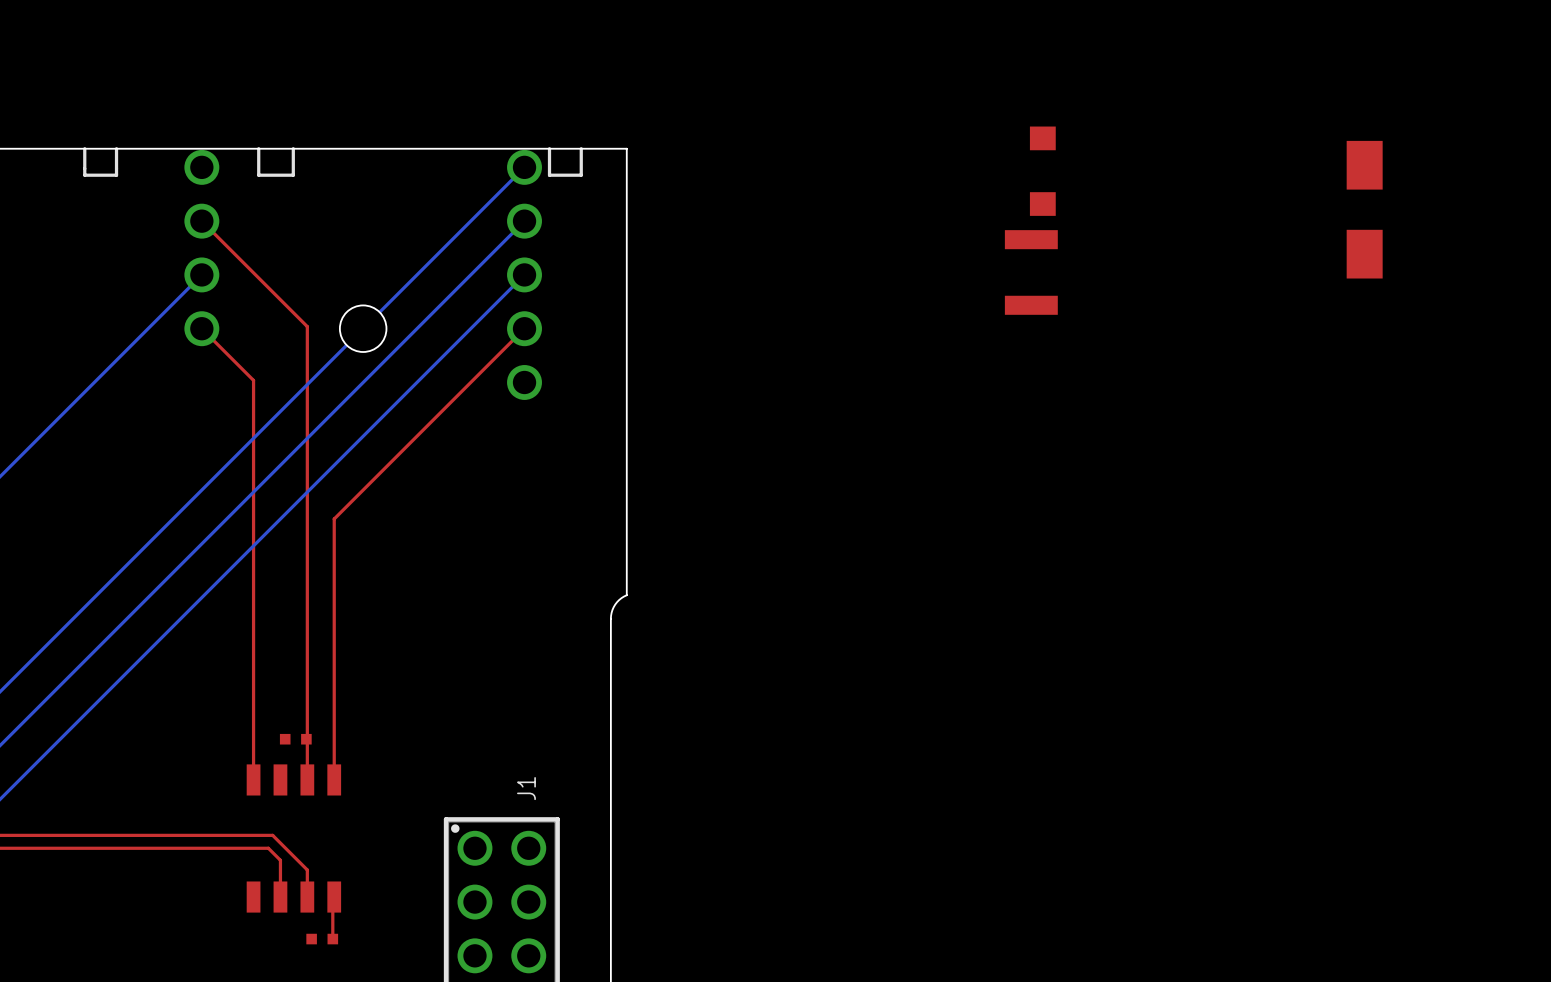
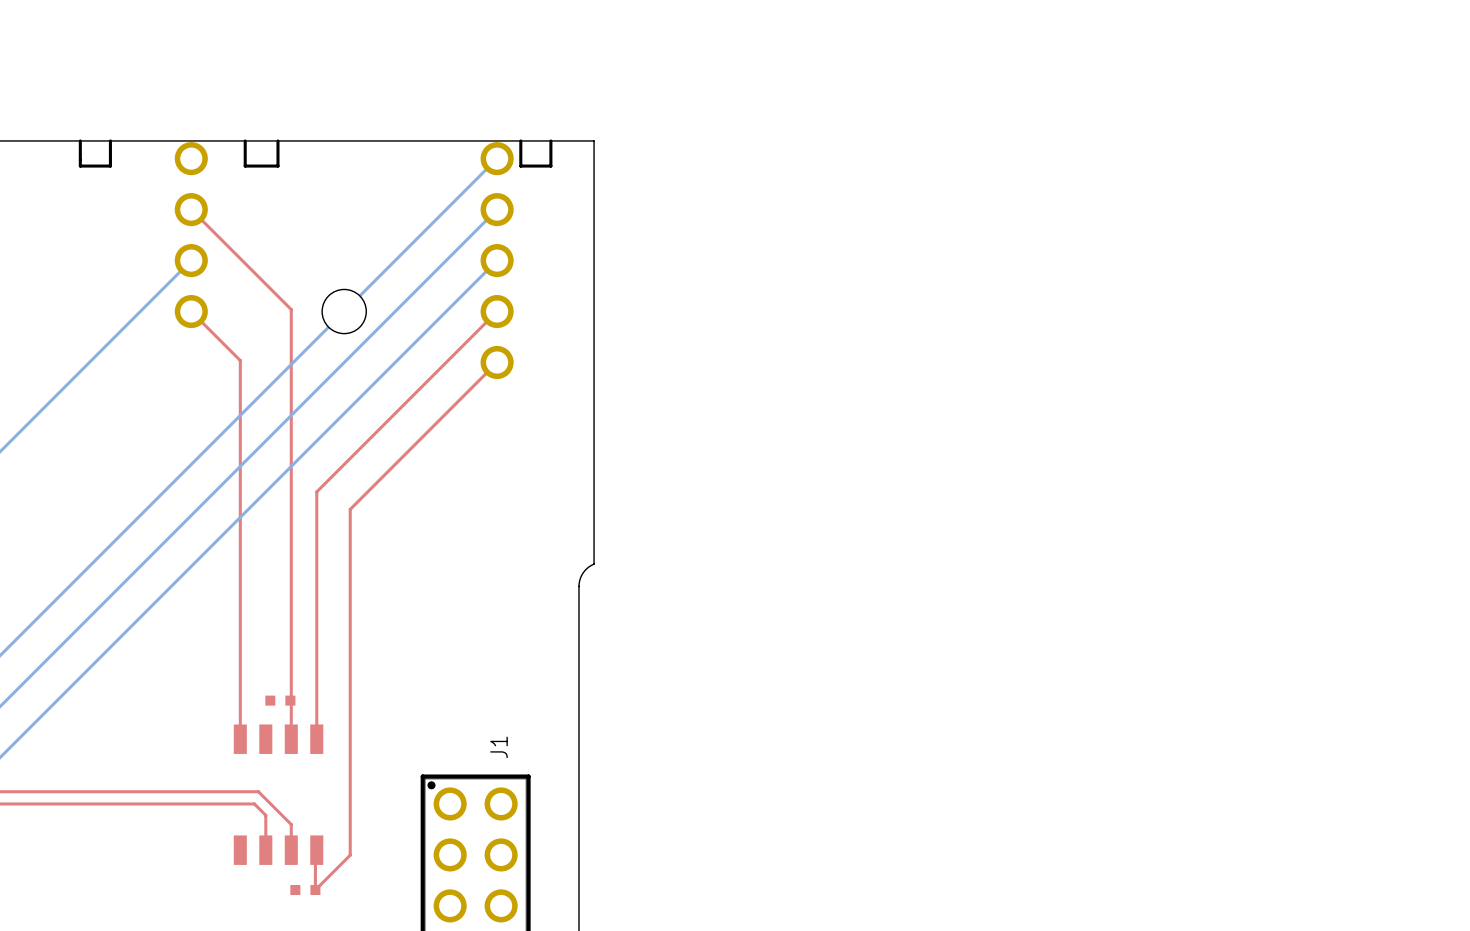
part: (1042, 171) -> none
part: (1364, 209) -> none
part: (1031, 272) -> none
top track: none -> (497, 362) (350, 509) (350, 855) (315, 890)

